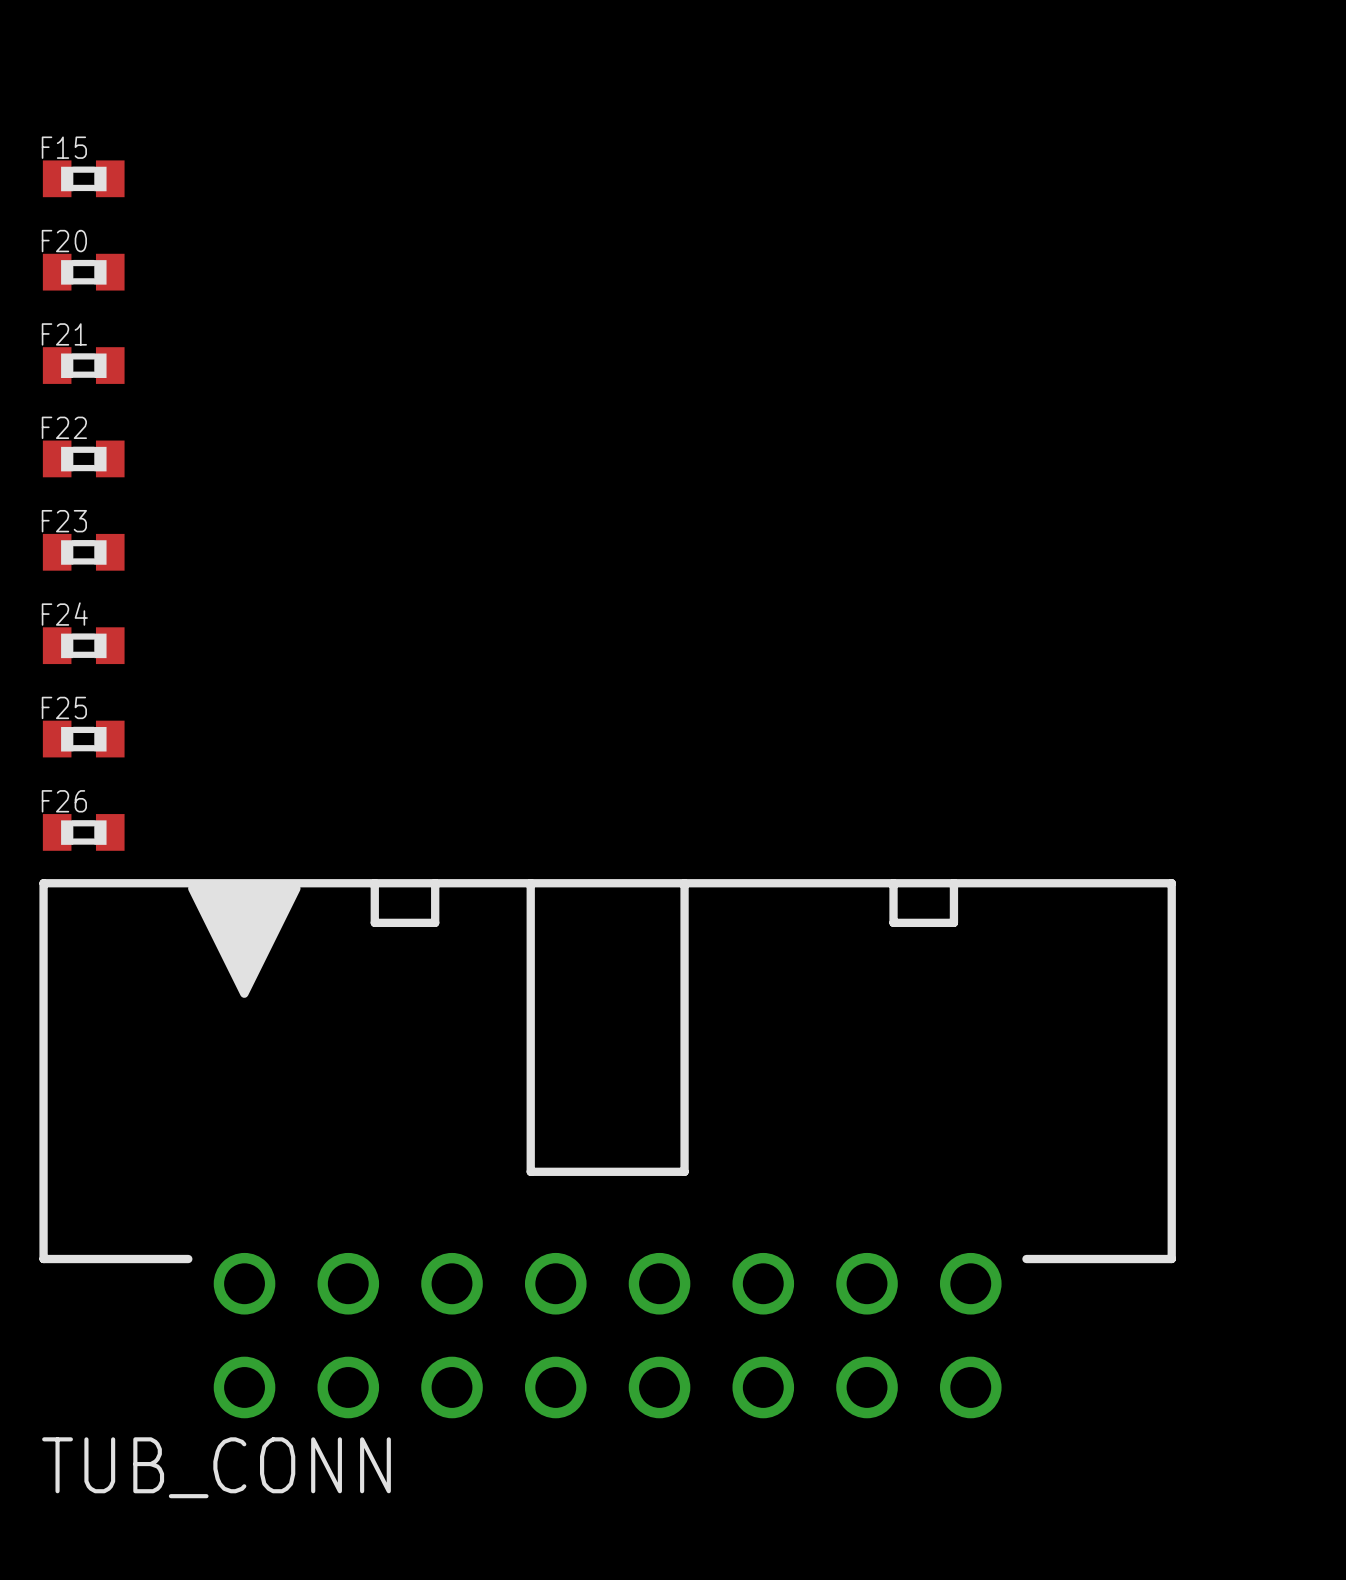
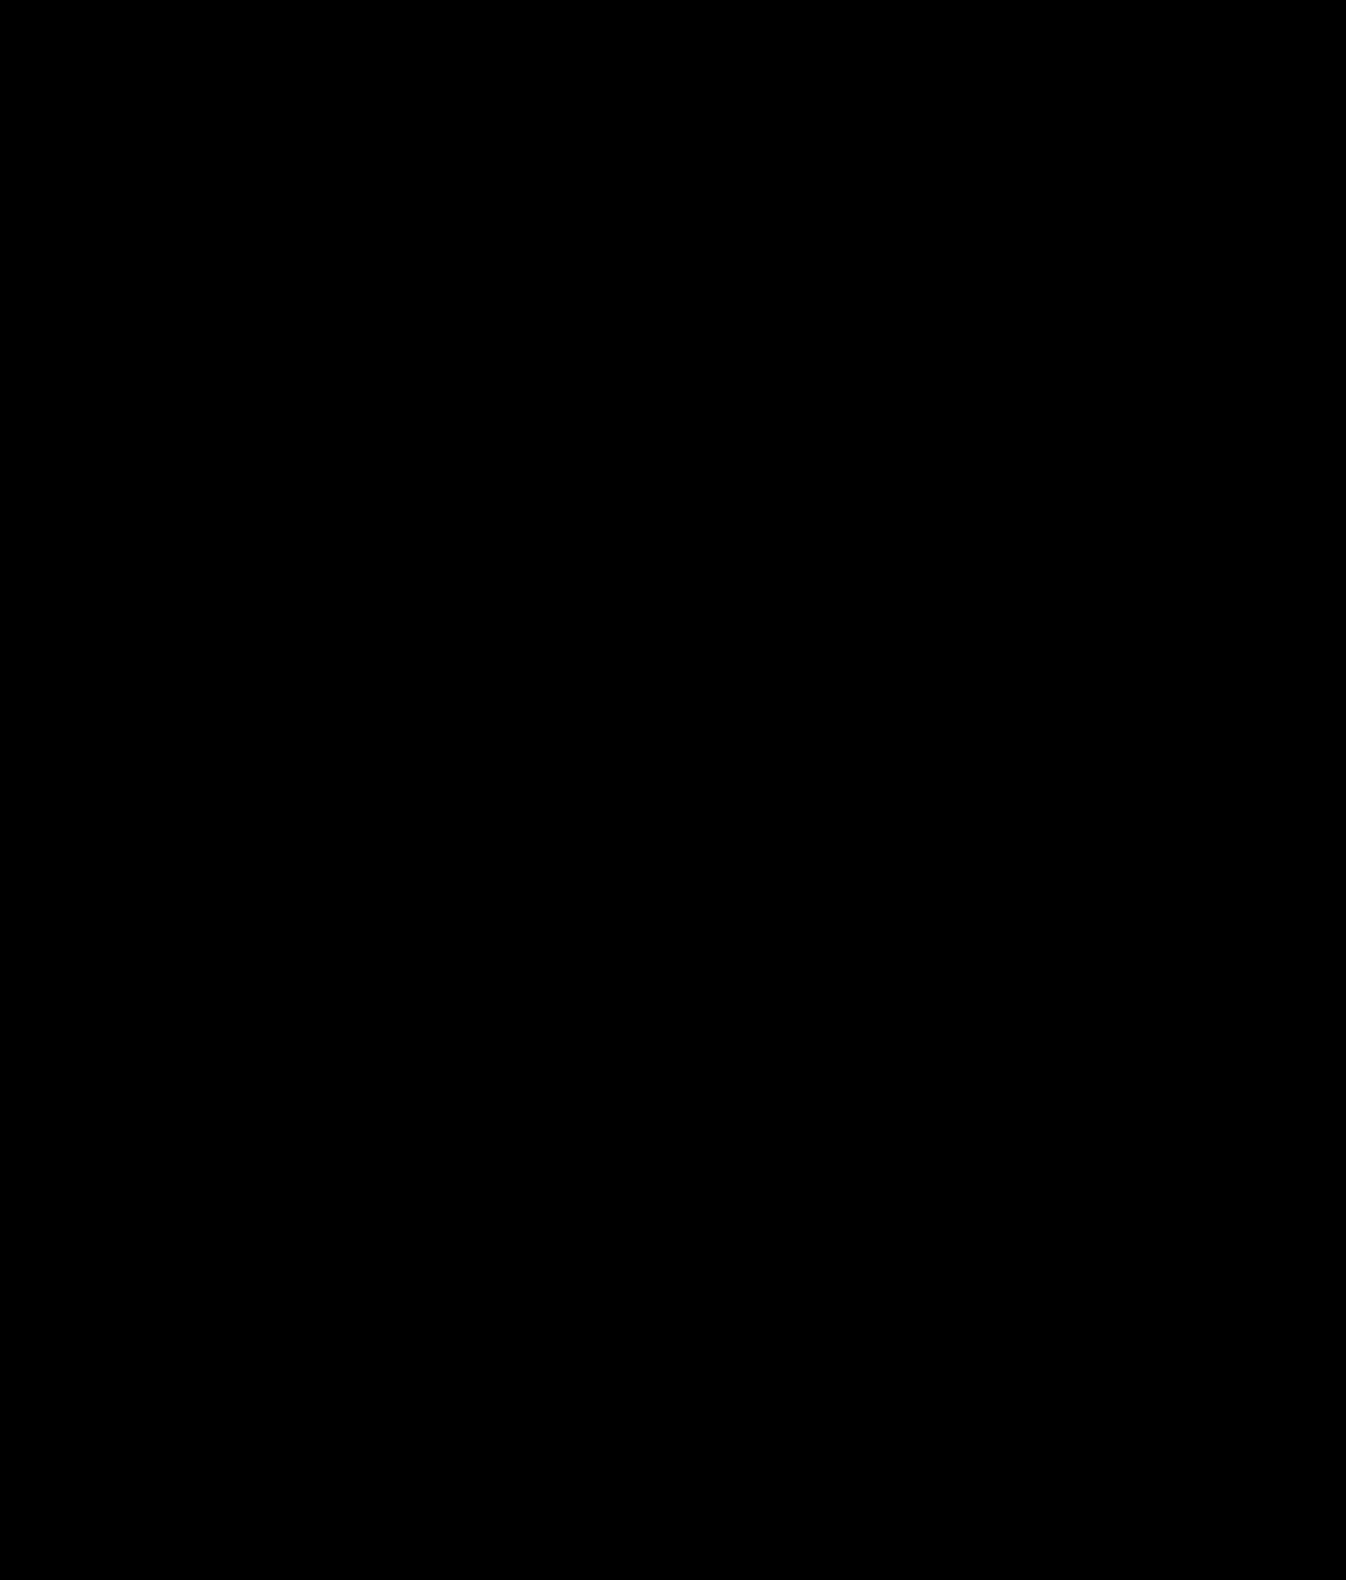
F15: (83, 178) -> none
F20: (83, 272) -> none
F21: (83, 365) -> none
F22: (83, 458) -> none
F23: (83, 552) -> none
F24: (83, 645) -> none
F25: (83, 739) -> none
F26: (83, 832) -> none
TUB_CONN: (607, 1148) -> none

